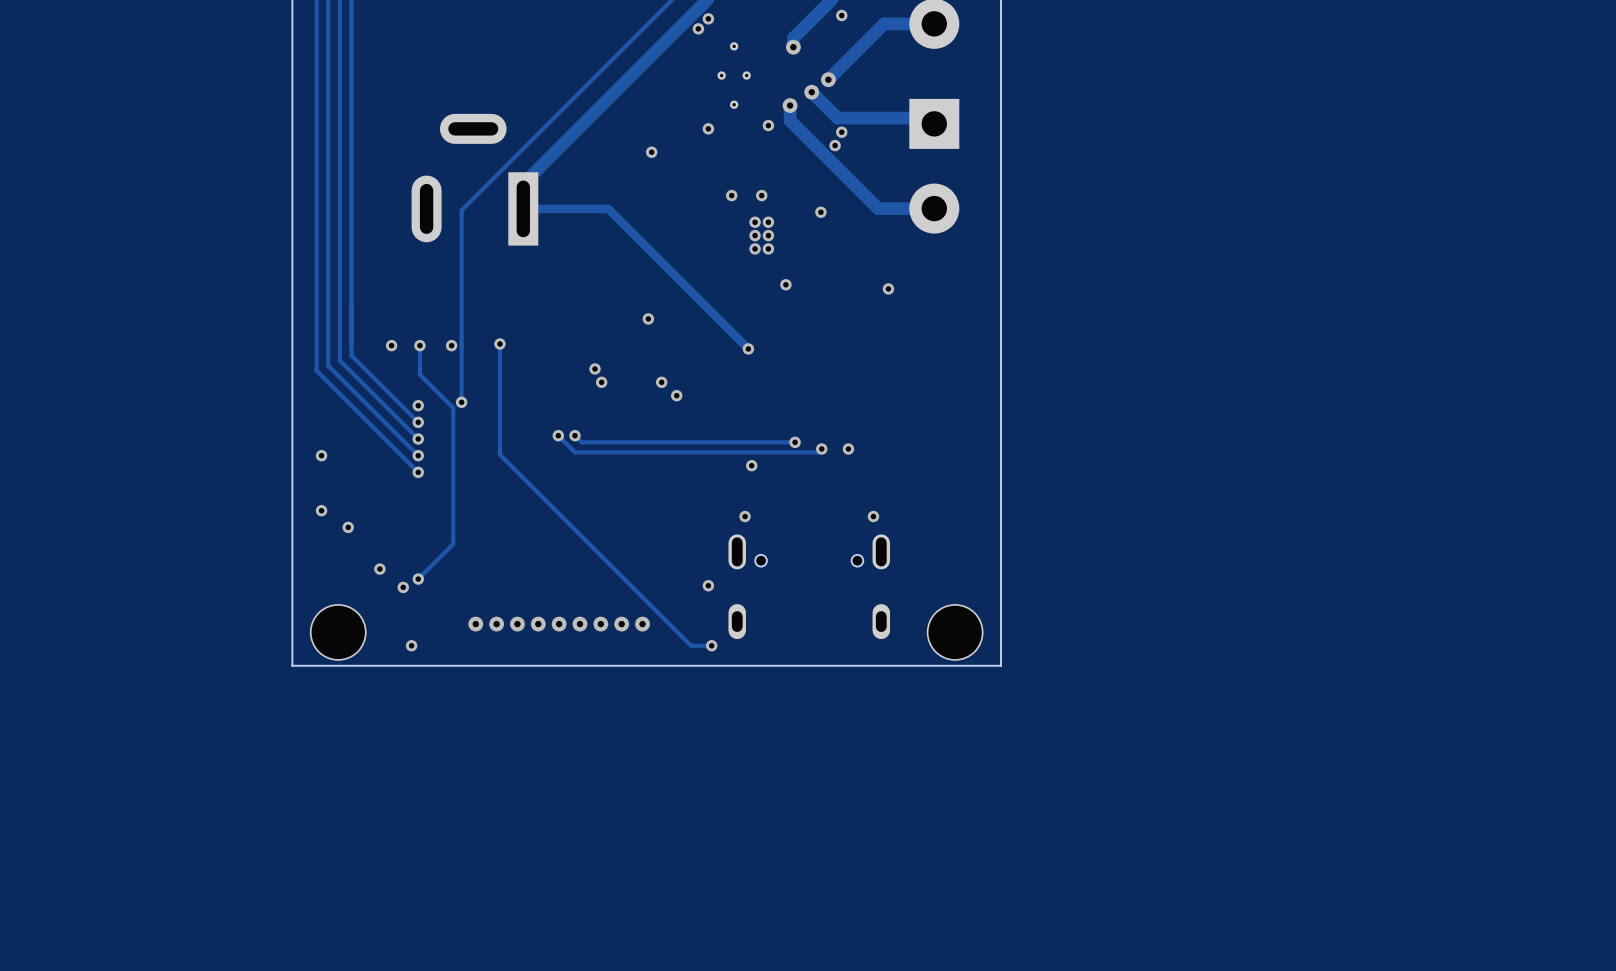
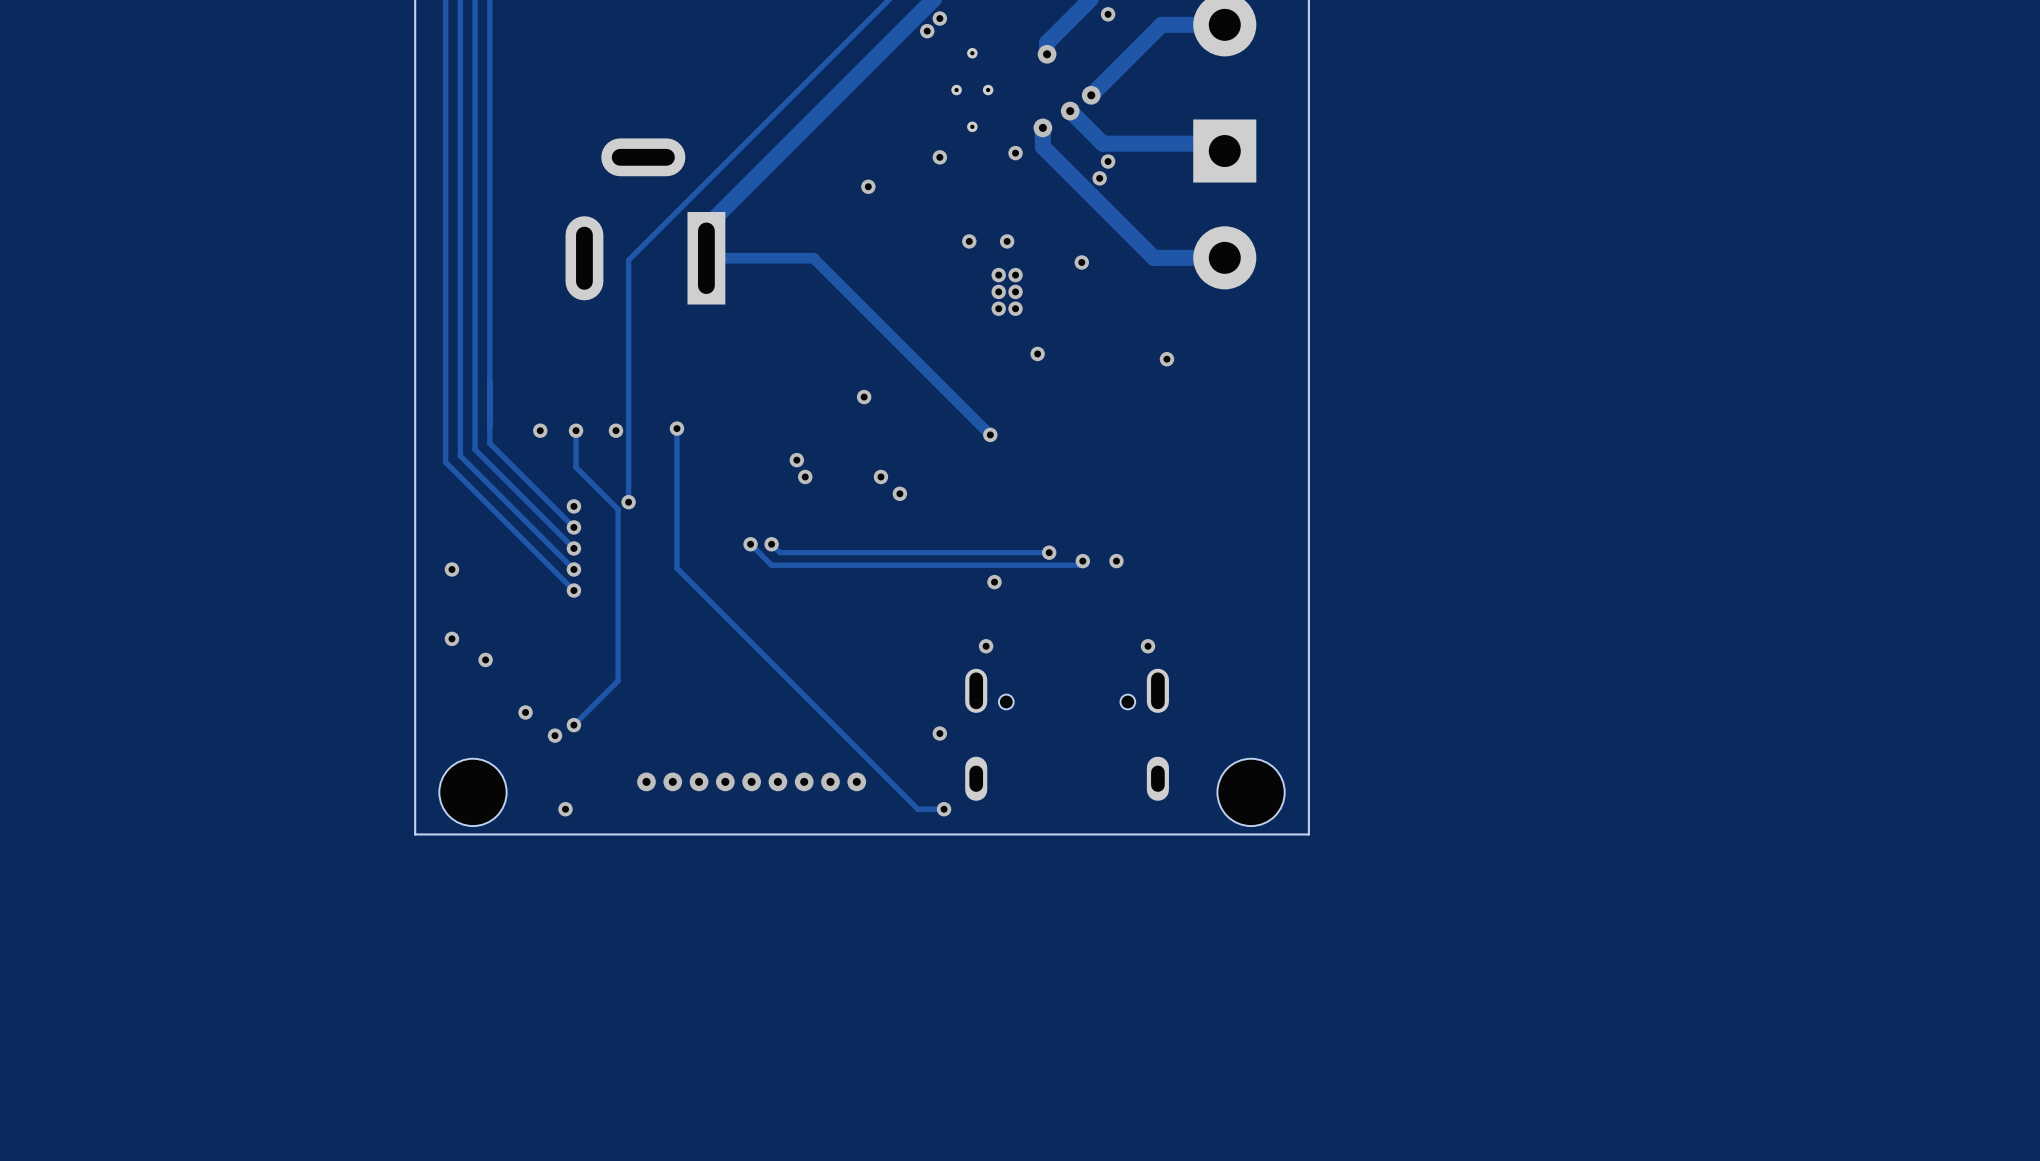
part footprint: [309, 604, 367, 661] -> [439, 758, 507, 827]
part footprint: [926, 604, 984, 661] -> [1217, 758, 1285, 827]

